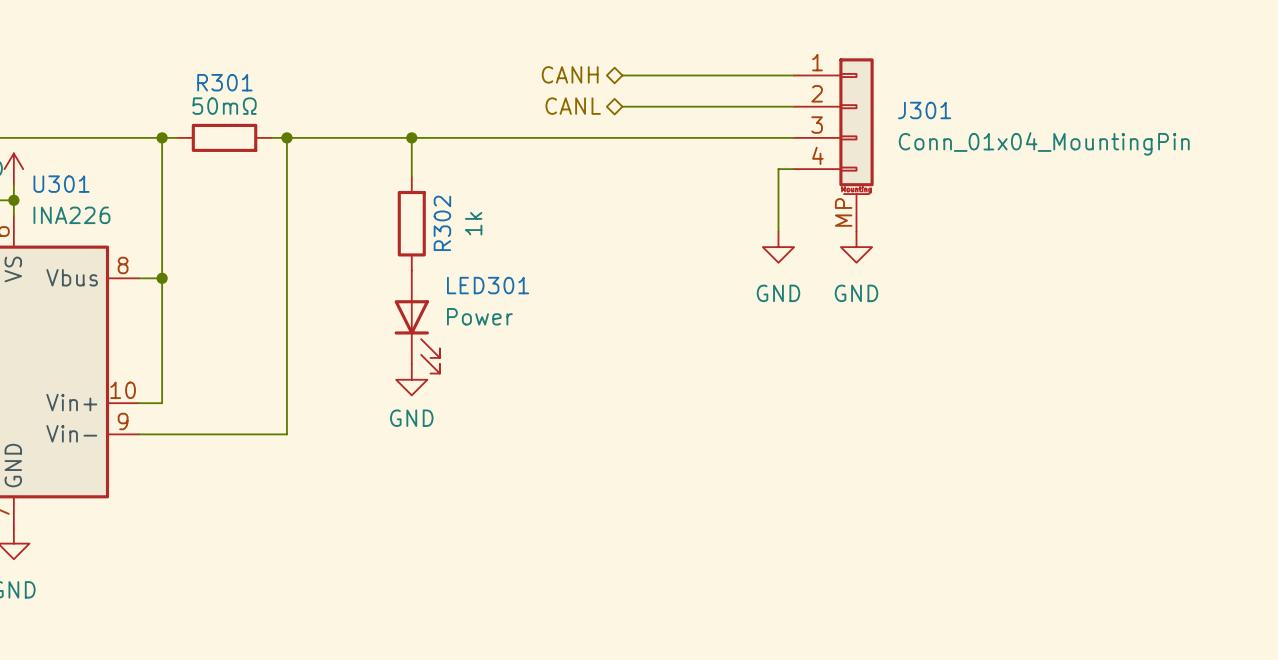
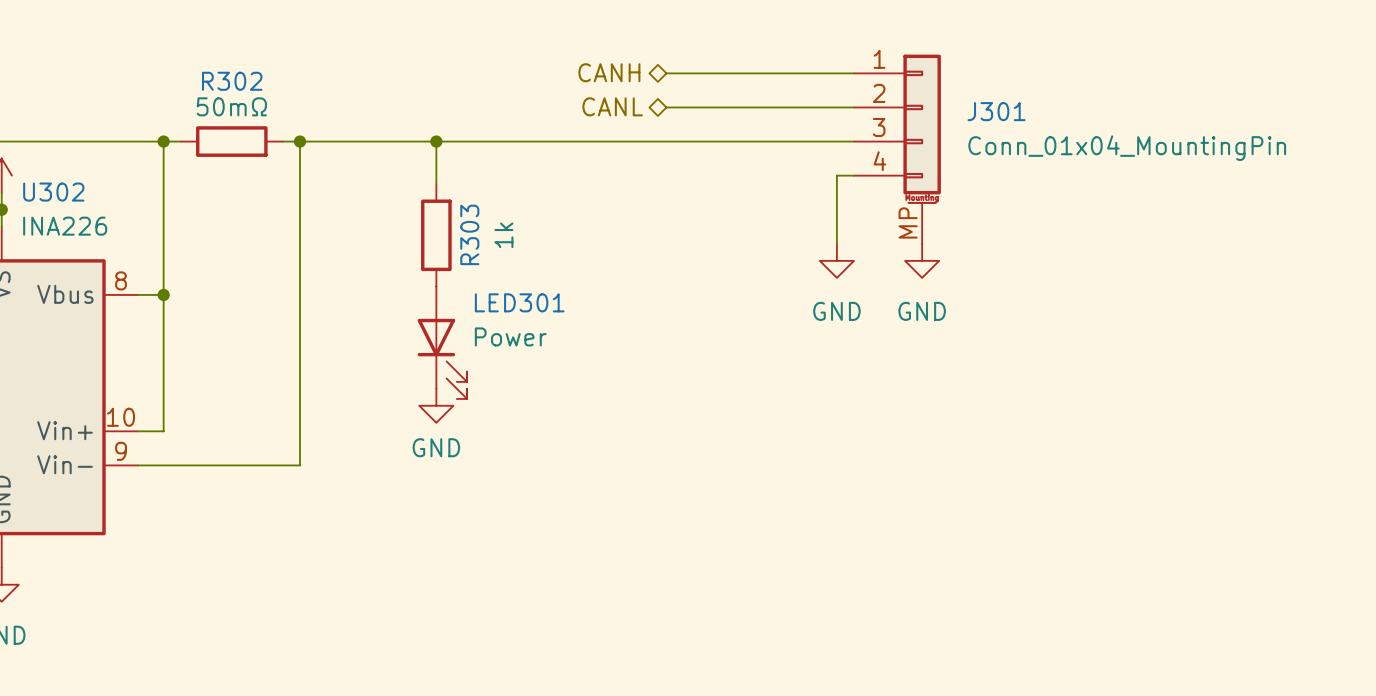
R301 name: R301 (224, 82) -> R302 (232, 81)
U301 name: U301 (61, 184) -> U302 (53, 192)
R302 name: R302 (442, 223) -> R303 (469, 234)

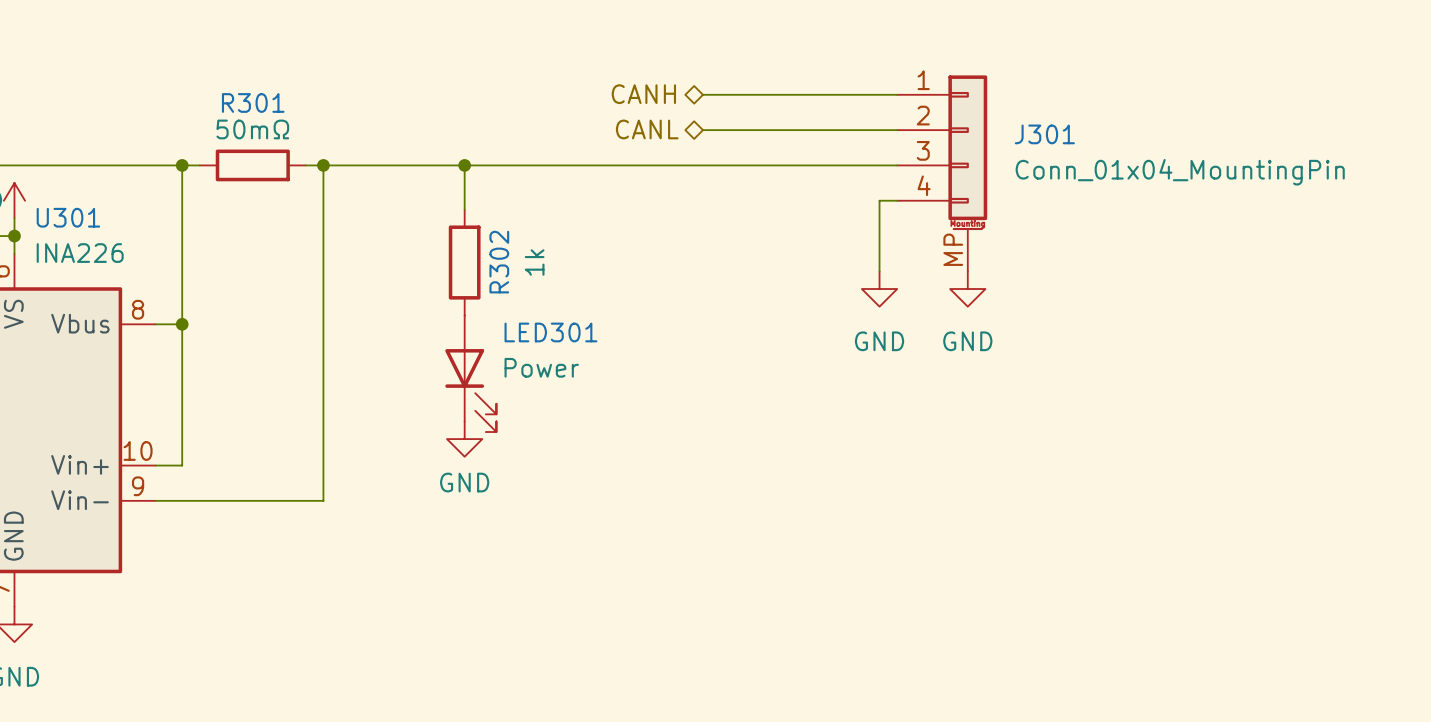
R302 name: R302 (232, 81) -> R301 (253, 102)
U302 name: U302 (53, 192) -> U301 (68, 217)
R303 name: R303 (469, 234) -> R302 (499, 262)

